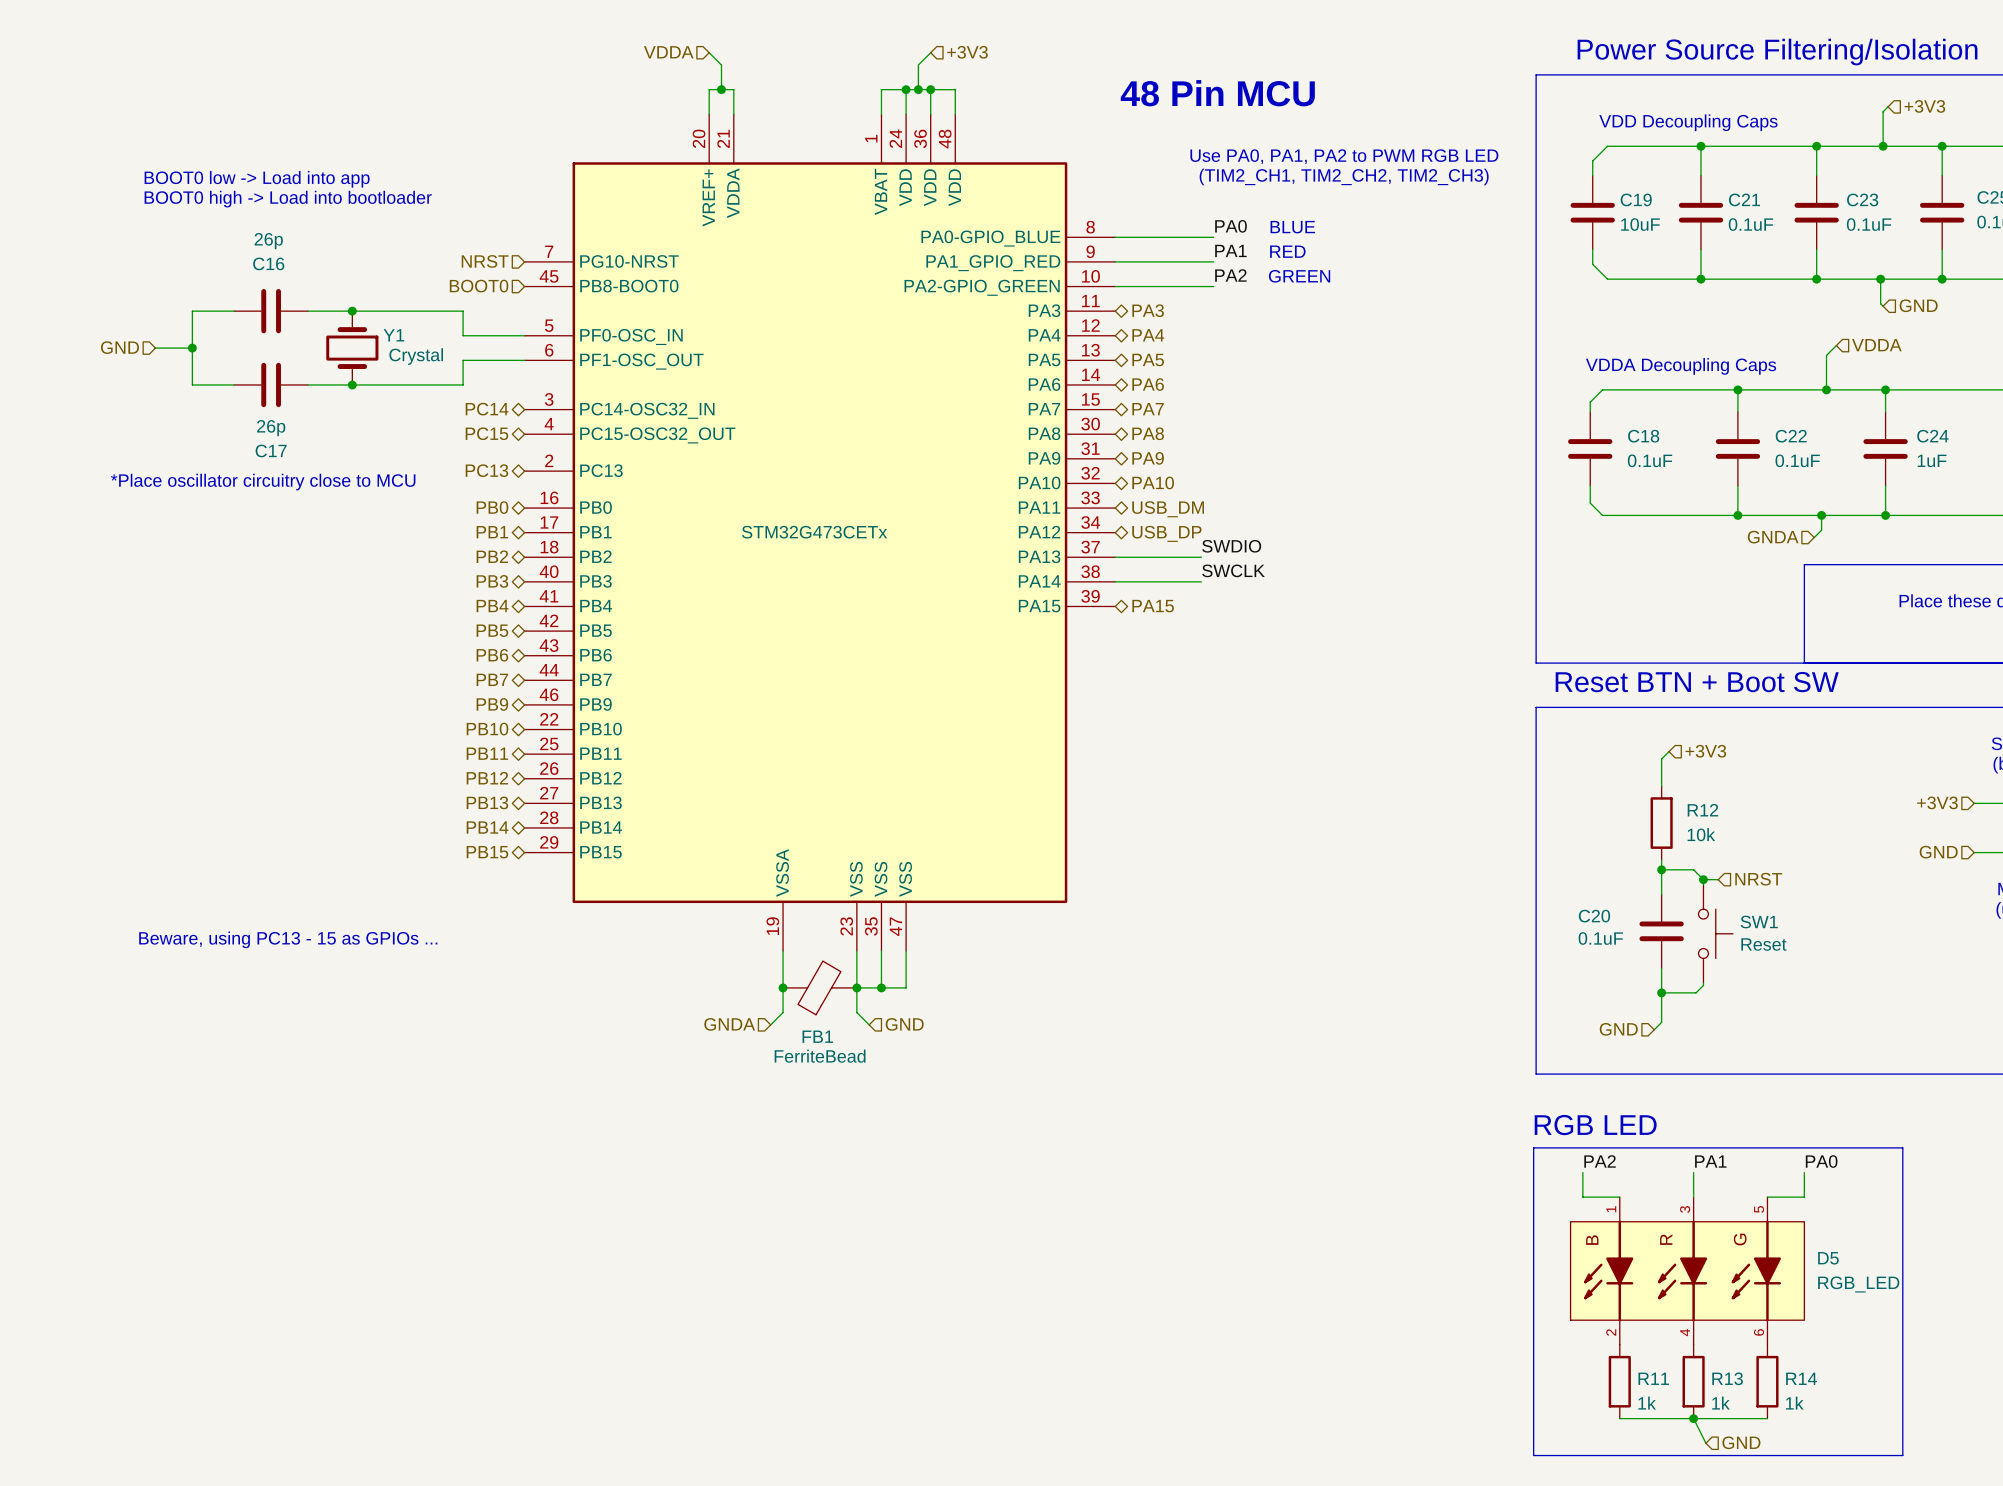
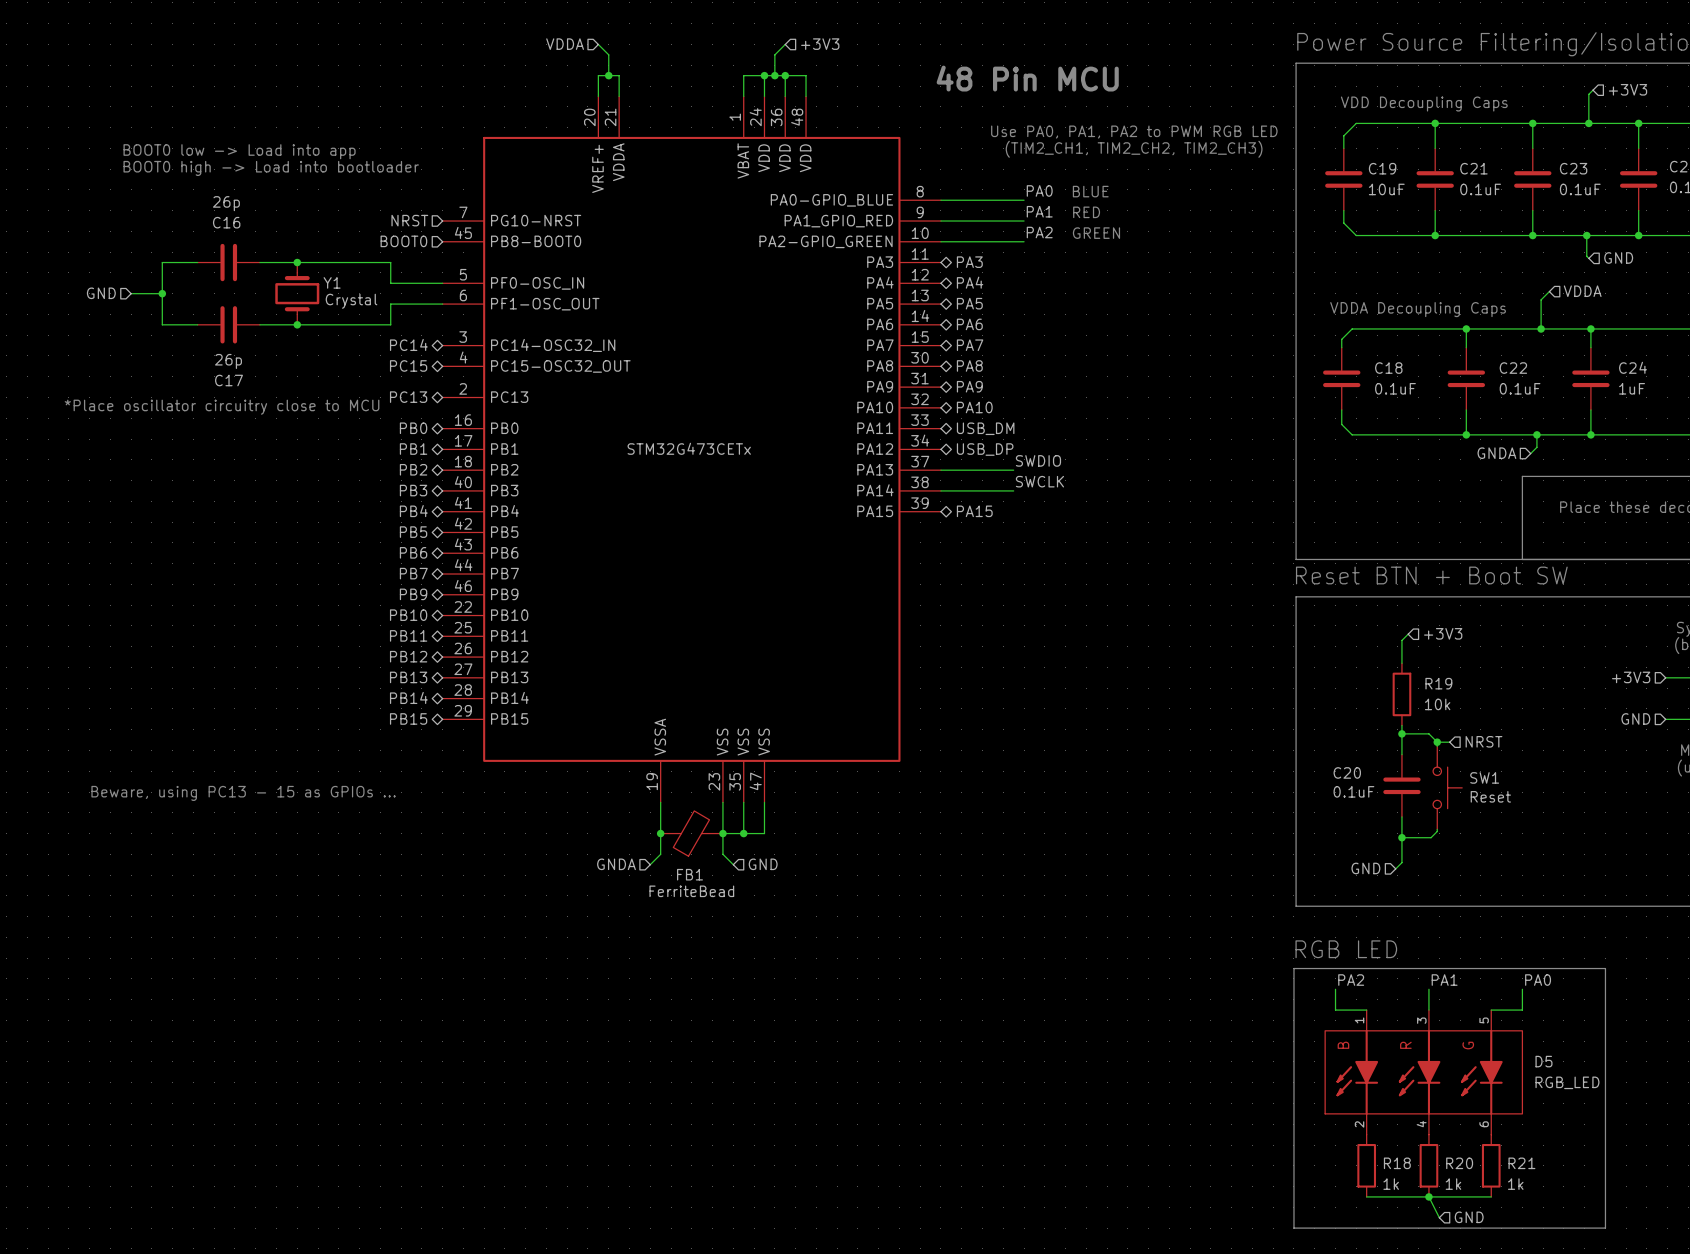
R12 name: R12 (1702, 810) -> R19 (1438, 683)
R11 name: R11 (1653, 1378) -> R18 (1397, 1163)
R13 name: R13 (1727, 1378) -> R20 (1459, 1163)
R14 name: R14 (1801, 1378) -> R21 (1521, 1163)

